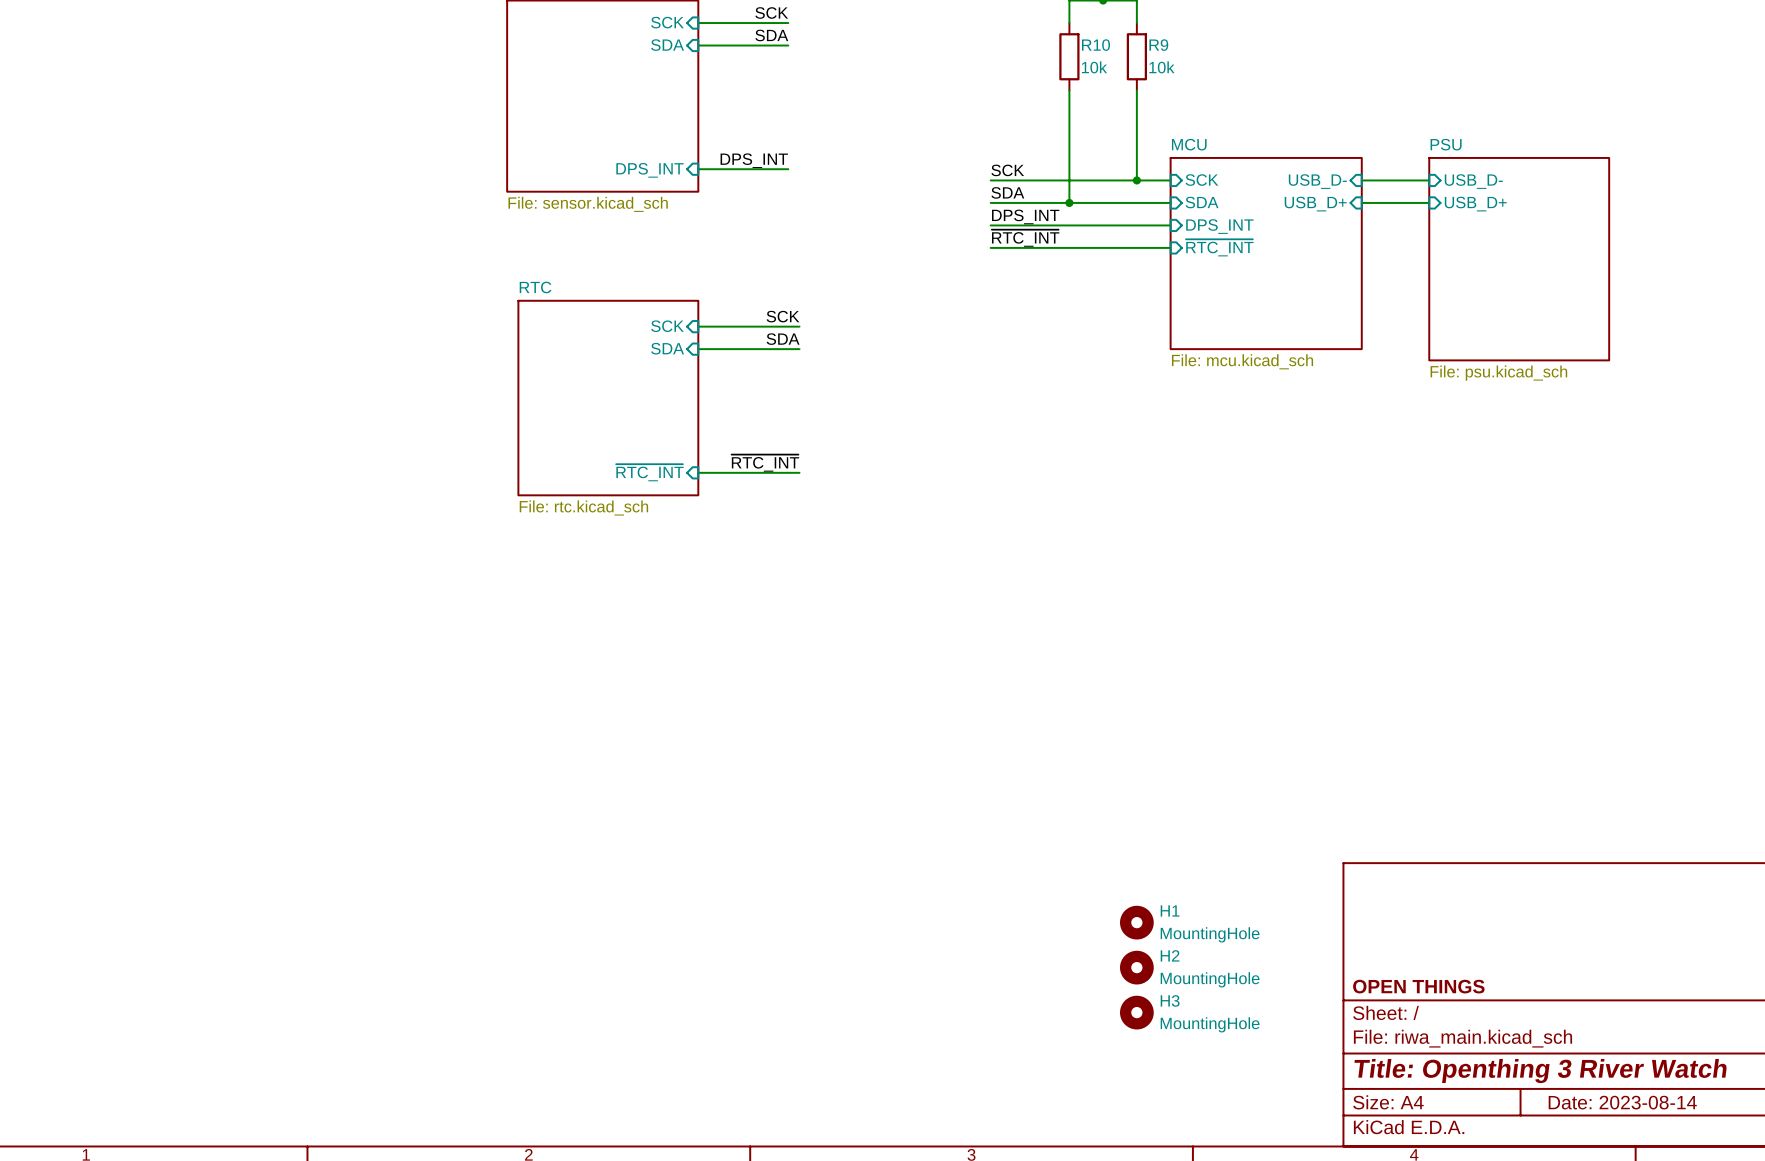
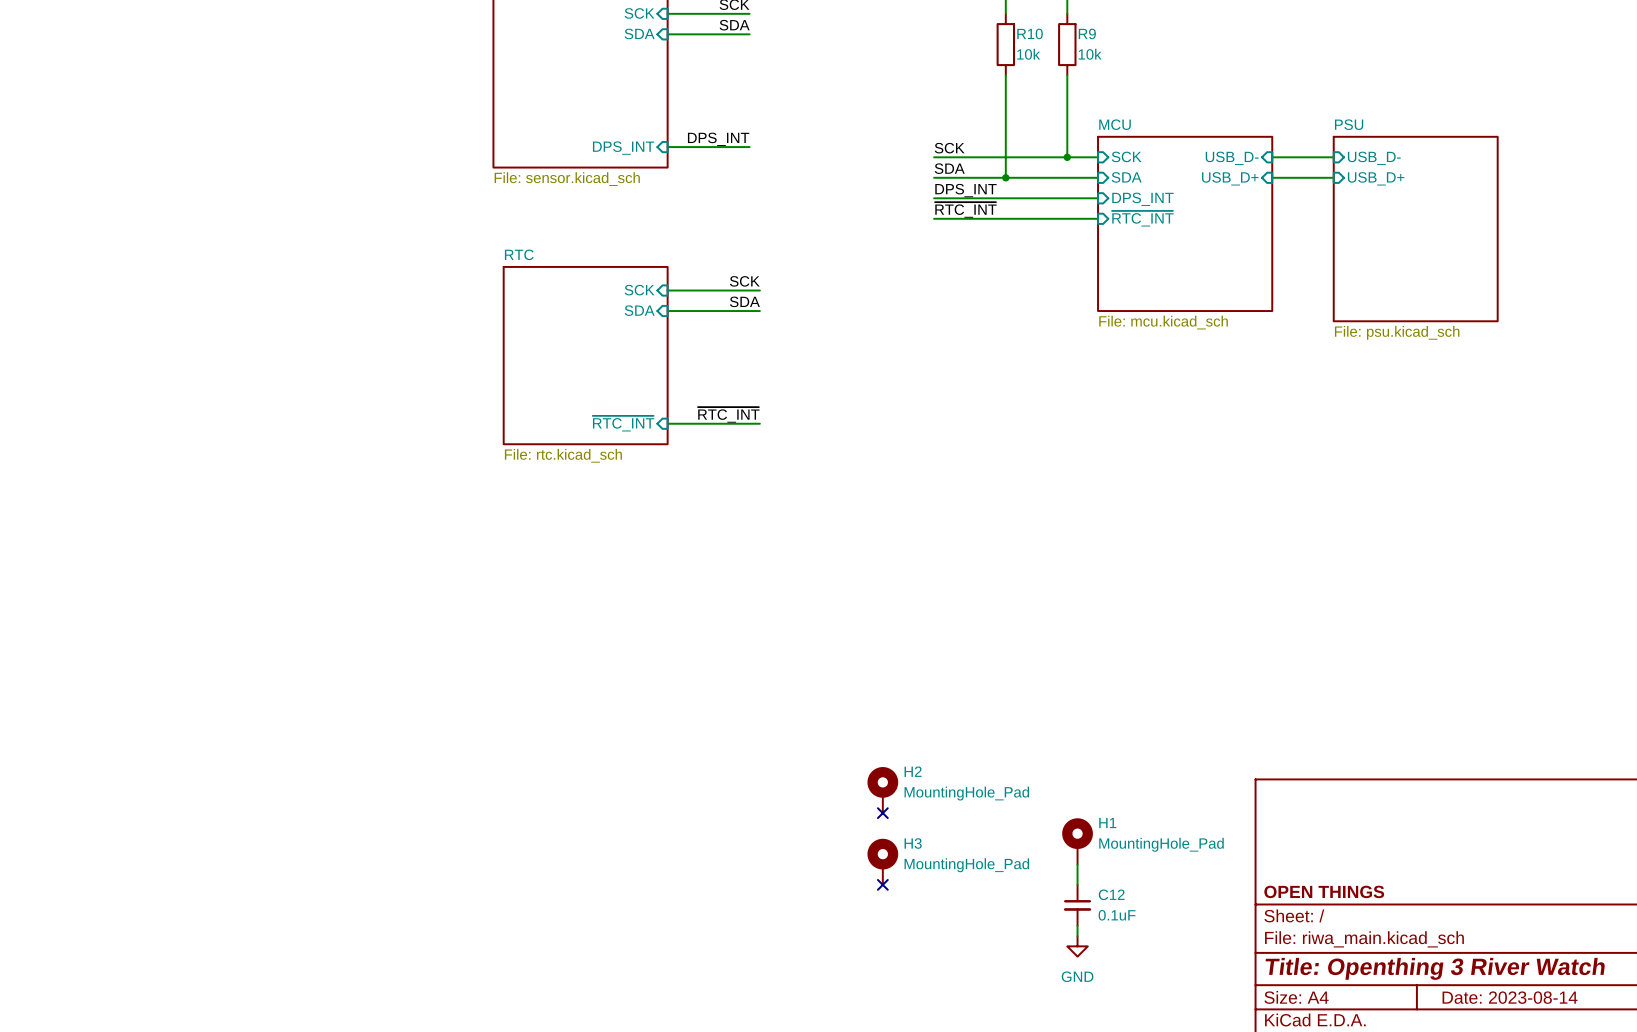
no-connect mark: none -> (882, 813)
H1 symbol: [1120, 905, 1154, 940] -> [1062, 818, 1093, 865]
H1 value: MountingHole (1210, 934) -> MountingHole_Pad (1161, 844)
H2 symbol: [1120, 950, 1154, 985] -> [867, 767, 899, 814]
no-connect mark: none -> (882, 884)
H2 value: MountingHole (1210, 979) -> MountingHole_Pad (966, 793)
H3 symbol: [1120, 995, 1154, 1030] -> [867, 838, 899, 885]
C12: none -> 0.1uF (1077, 905)
wire: none -> (1077, 925) (1077, 936)
H3 value: MountingHole (1210, 1024) -> MountingHole_Pad (966, 865)
power symbol: none -> GND (1077, 946)

